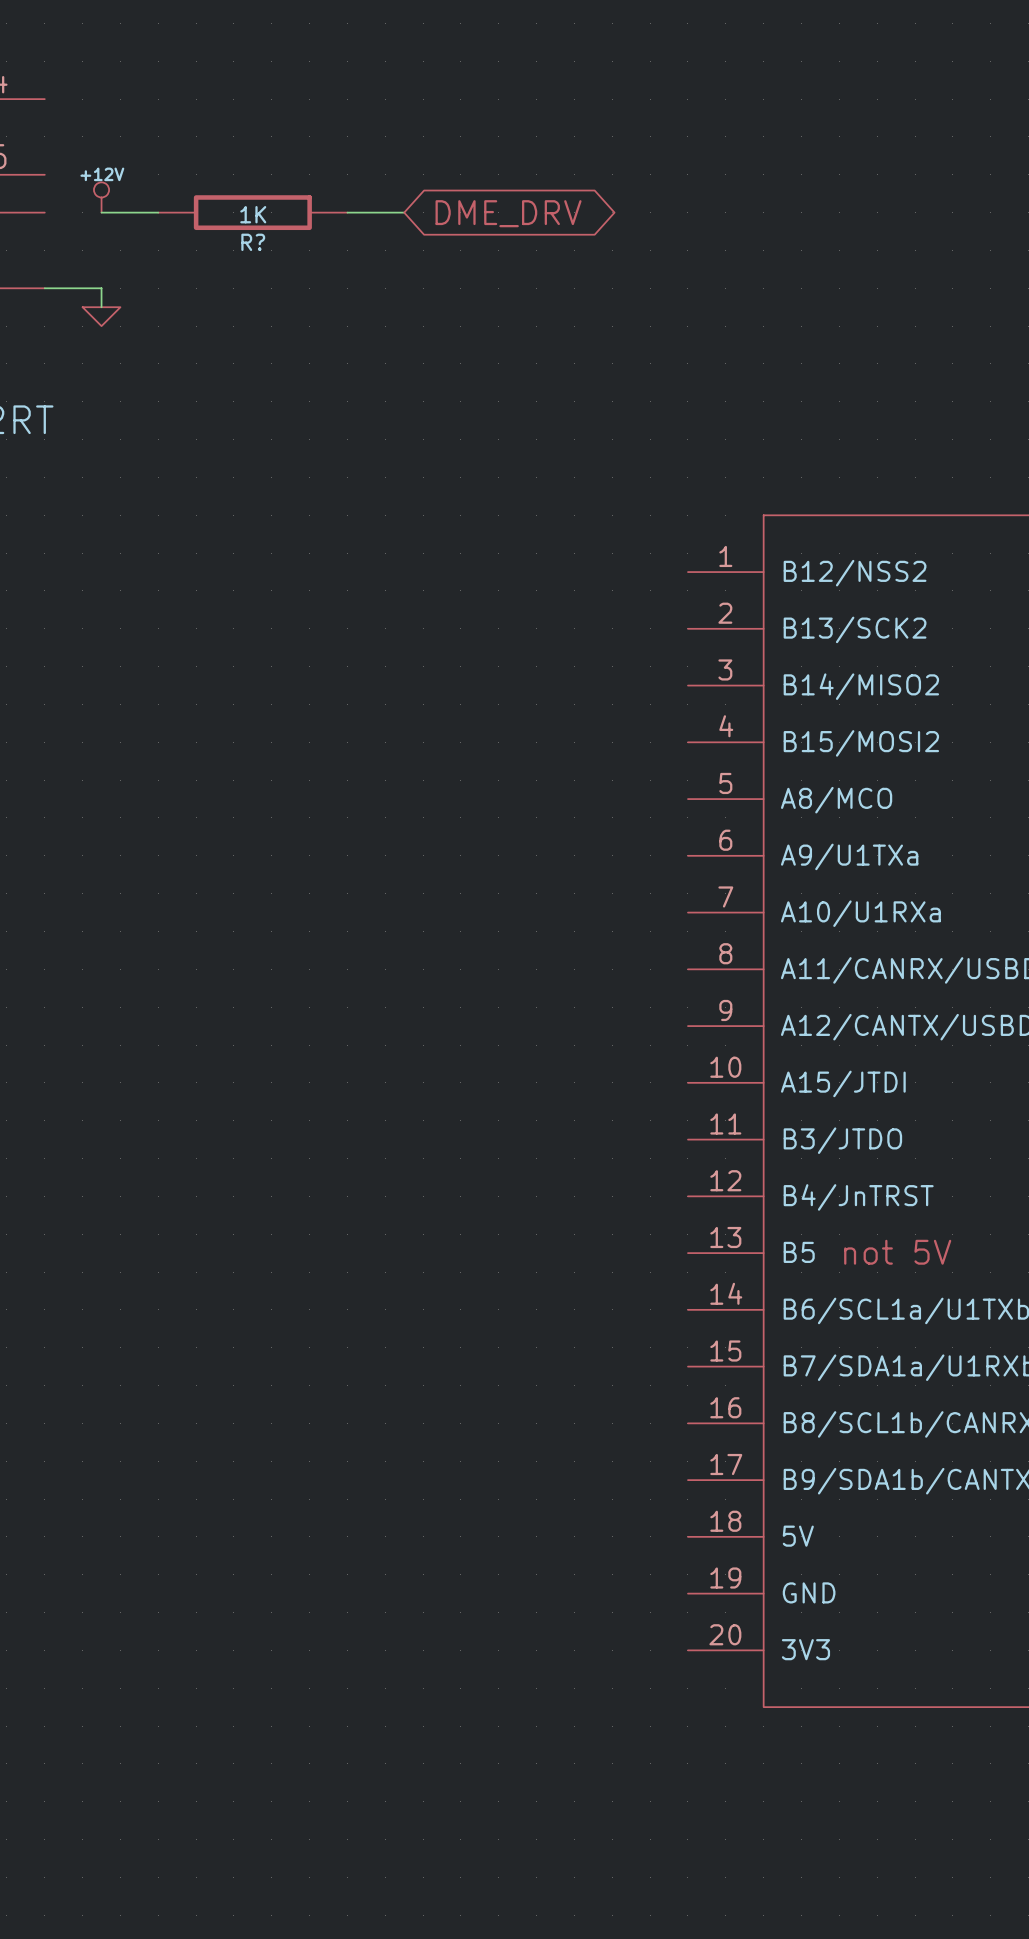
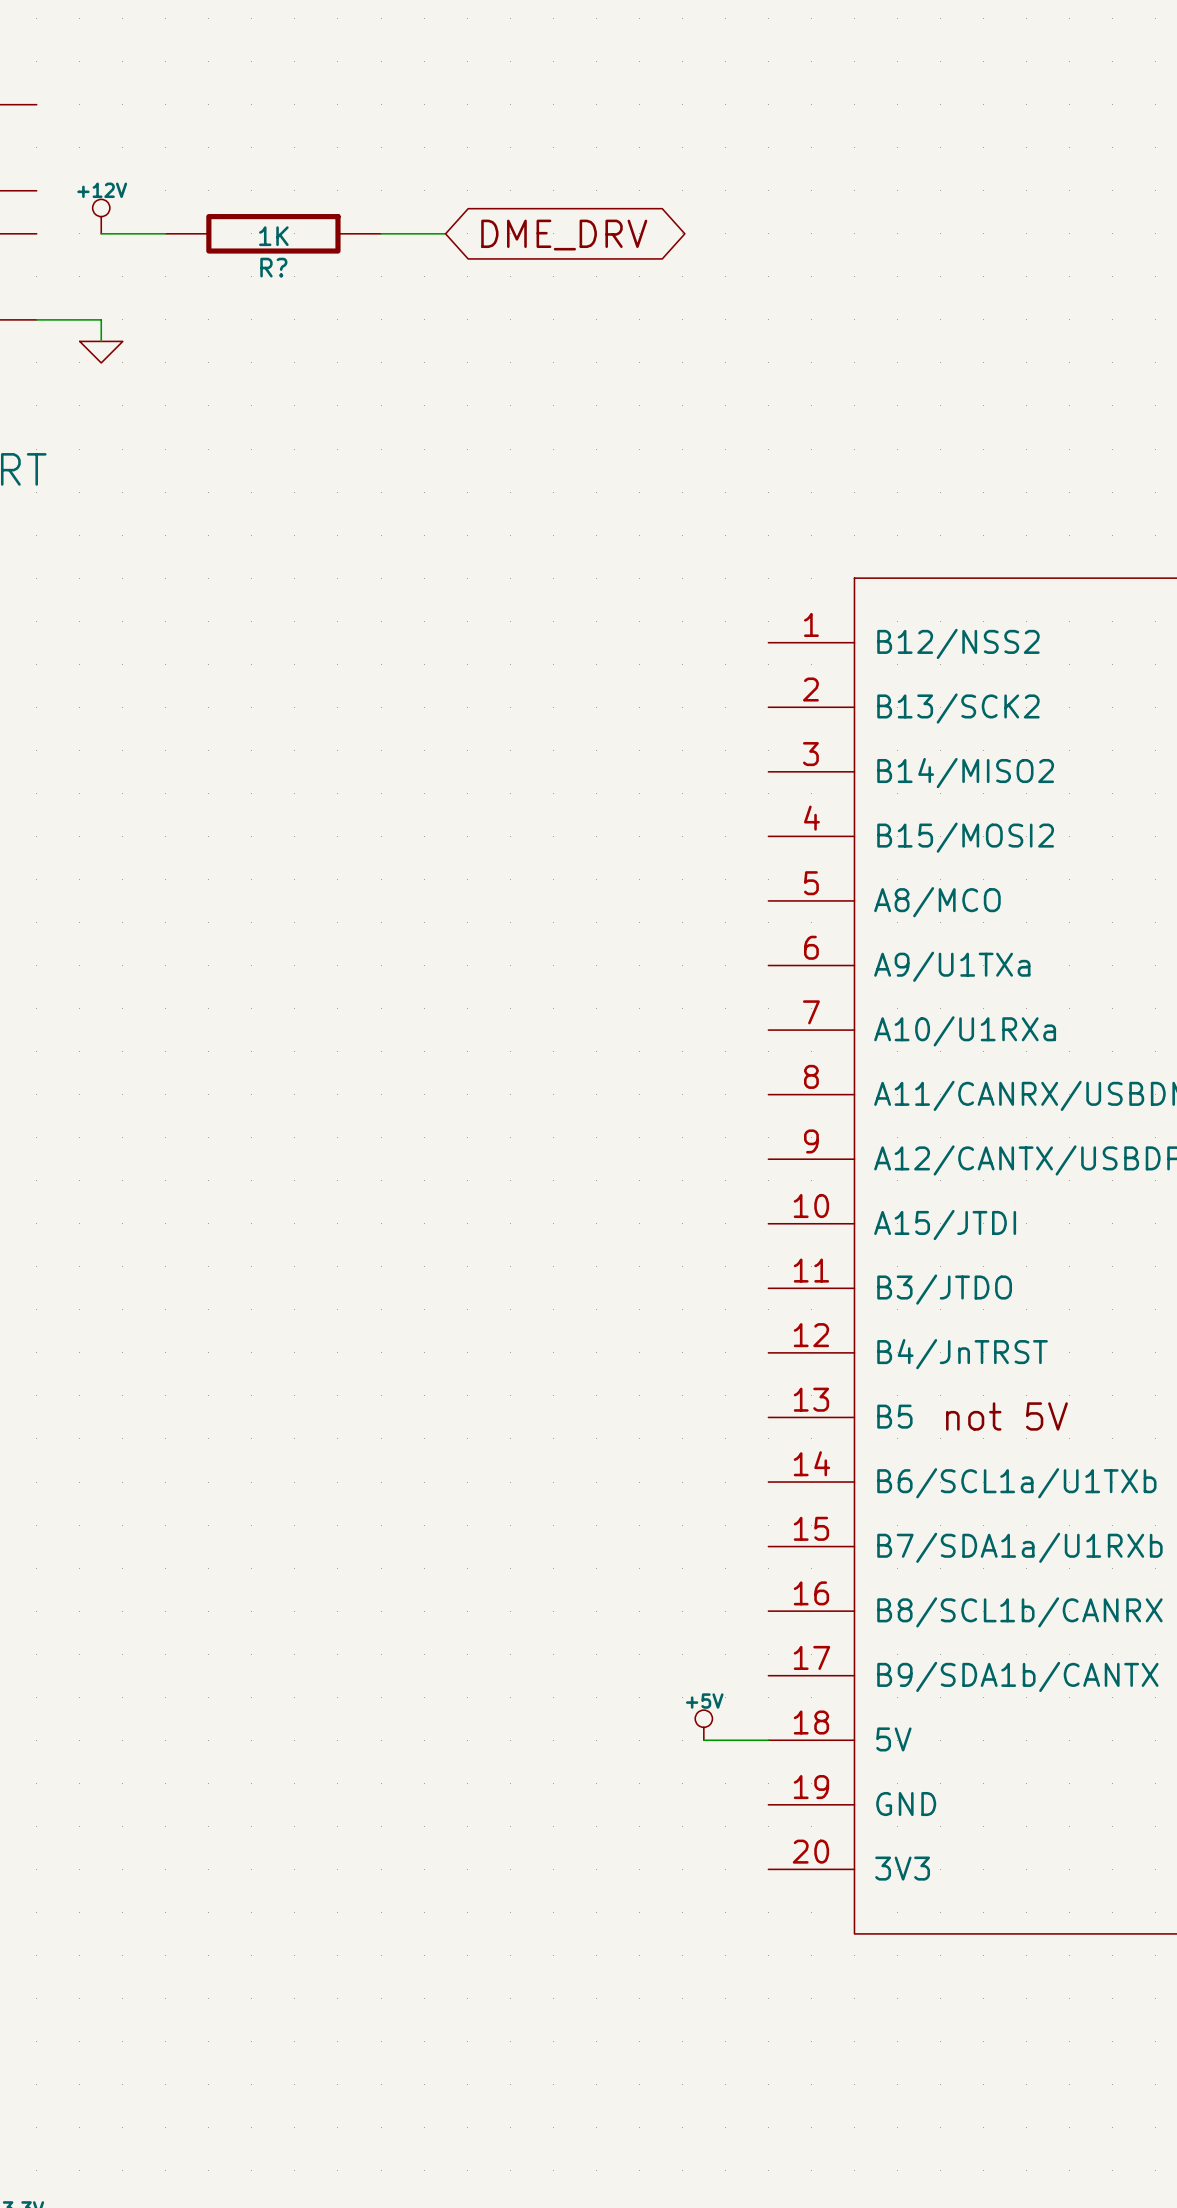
power symbol: none -> +5V (703, 1725)
wire: none -> (703, 1740) (768, 1740)

